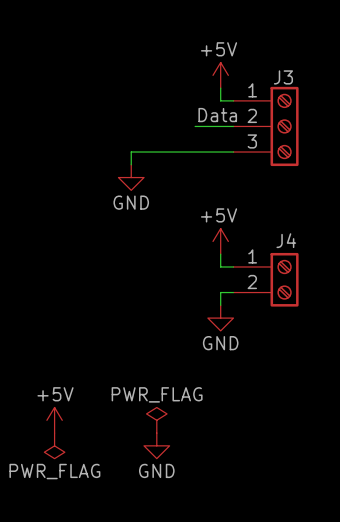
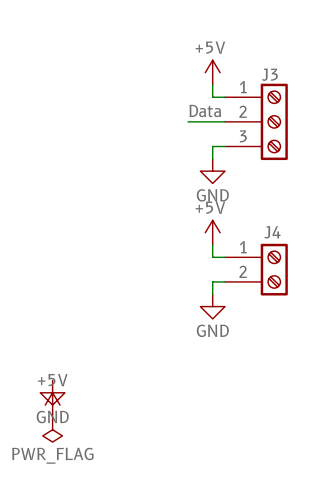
wire: (220, 152) (131, 152) (131, 164) -> (212, 146) (212, 158)
power symbol position: GND (131, 177) -> GND (212, 171)
power symbol: PWR_FLAG (156, 420) -> none
power symbol position: GND (156, 445) -> GND (52, 392)

